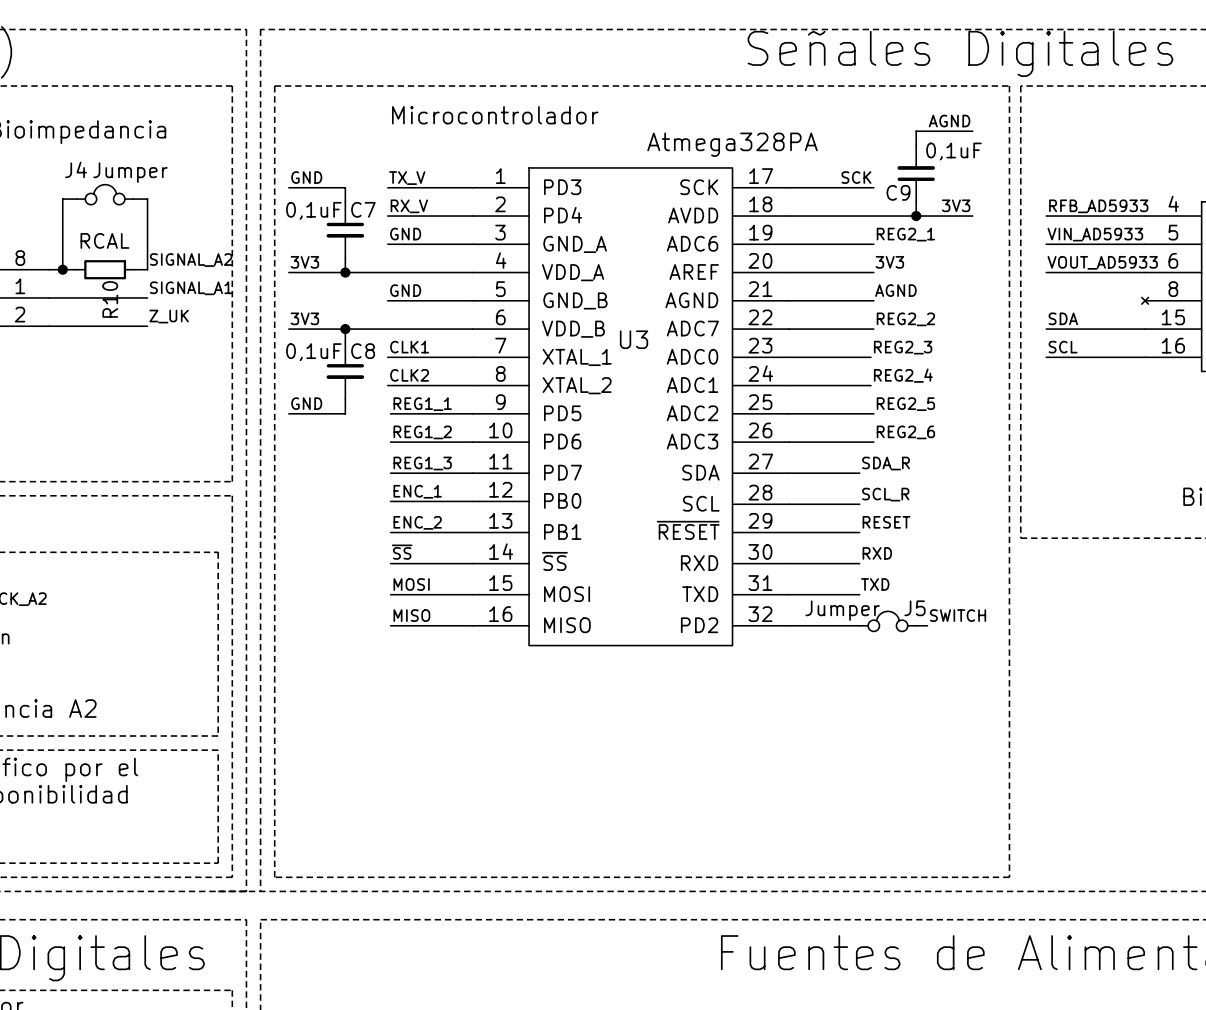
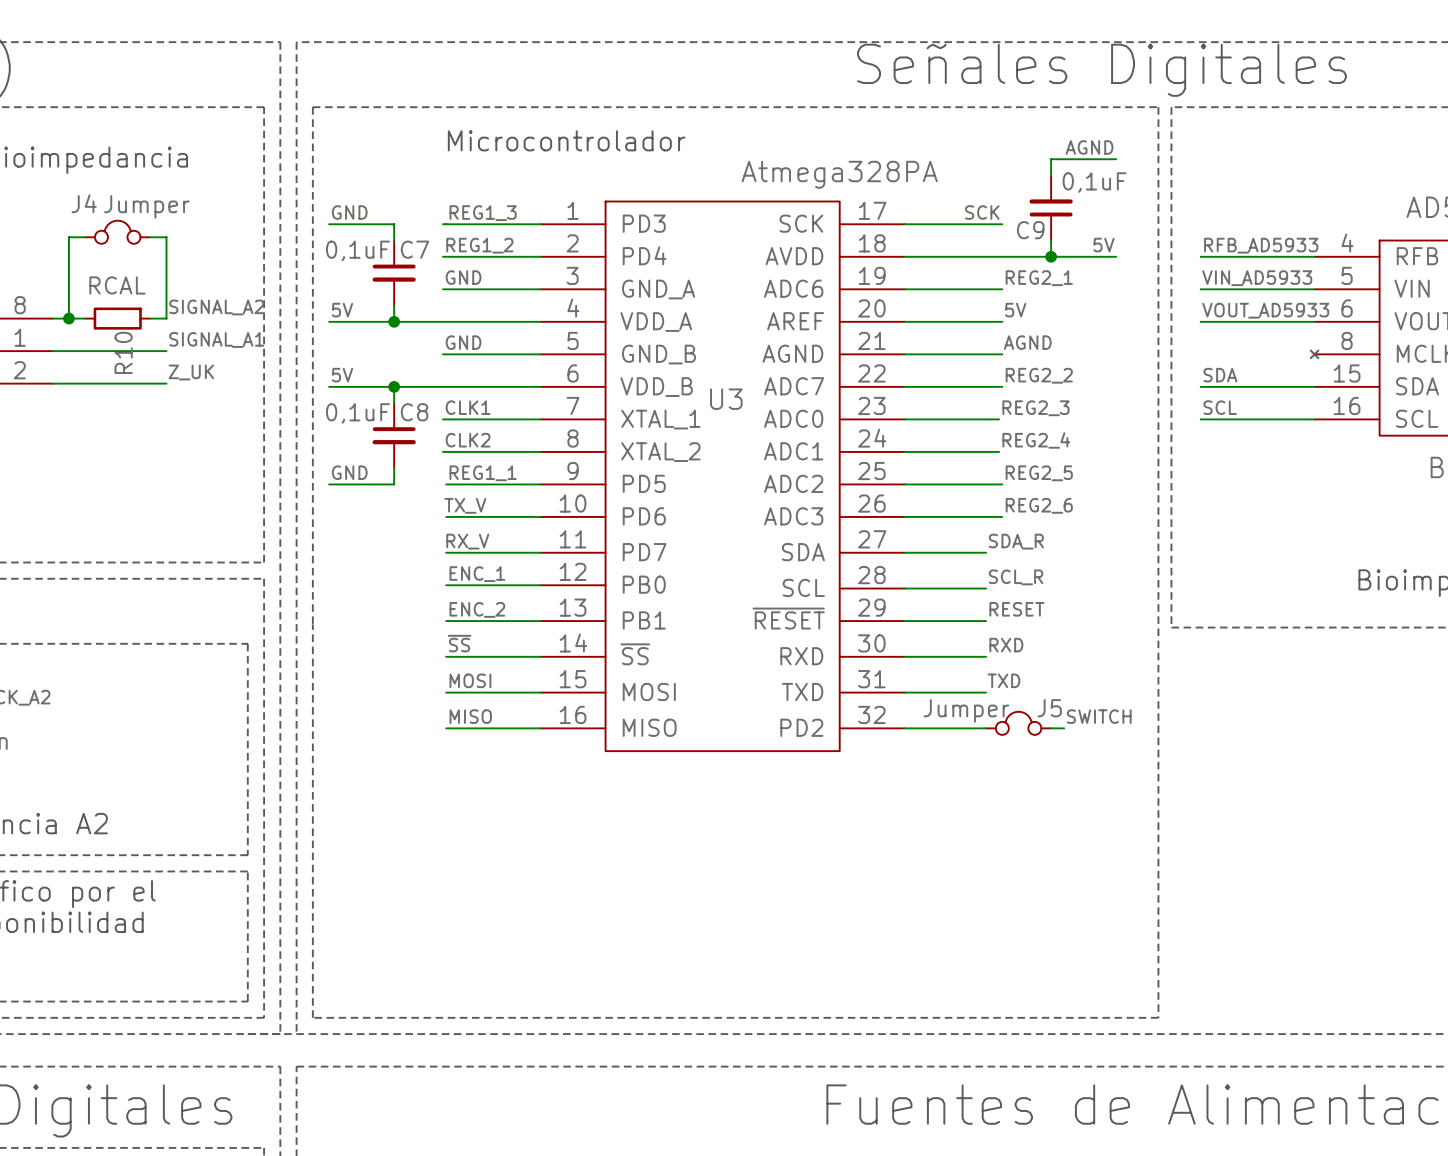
label: TX_V (407, 178) -> REG1_3 (483, 213)
label: 3V3 (956, 205) -> 5V (1104, 245)
label: RX_V (409, 206) -> REG1_2 (479, 245)
label: 3V3 (304, 262) -> 5V (342, 310)
label: 3V3 (889, 262) -> 5V (1015, 310)
label: 3V3 (304, 318) -> 5V (342, 375)
label: REG1_2 (422, 432) -> TX_V (465, 505)
label: REG1_3 (422, 463) -> RX_V (467, 541)

